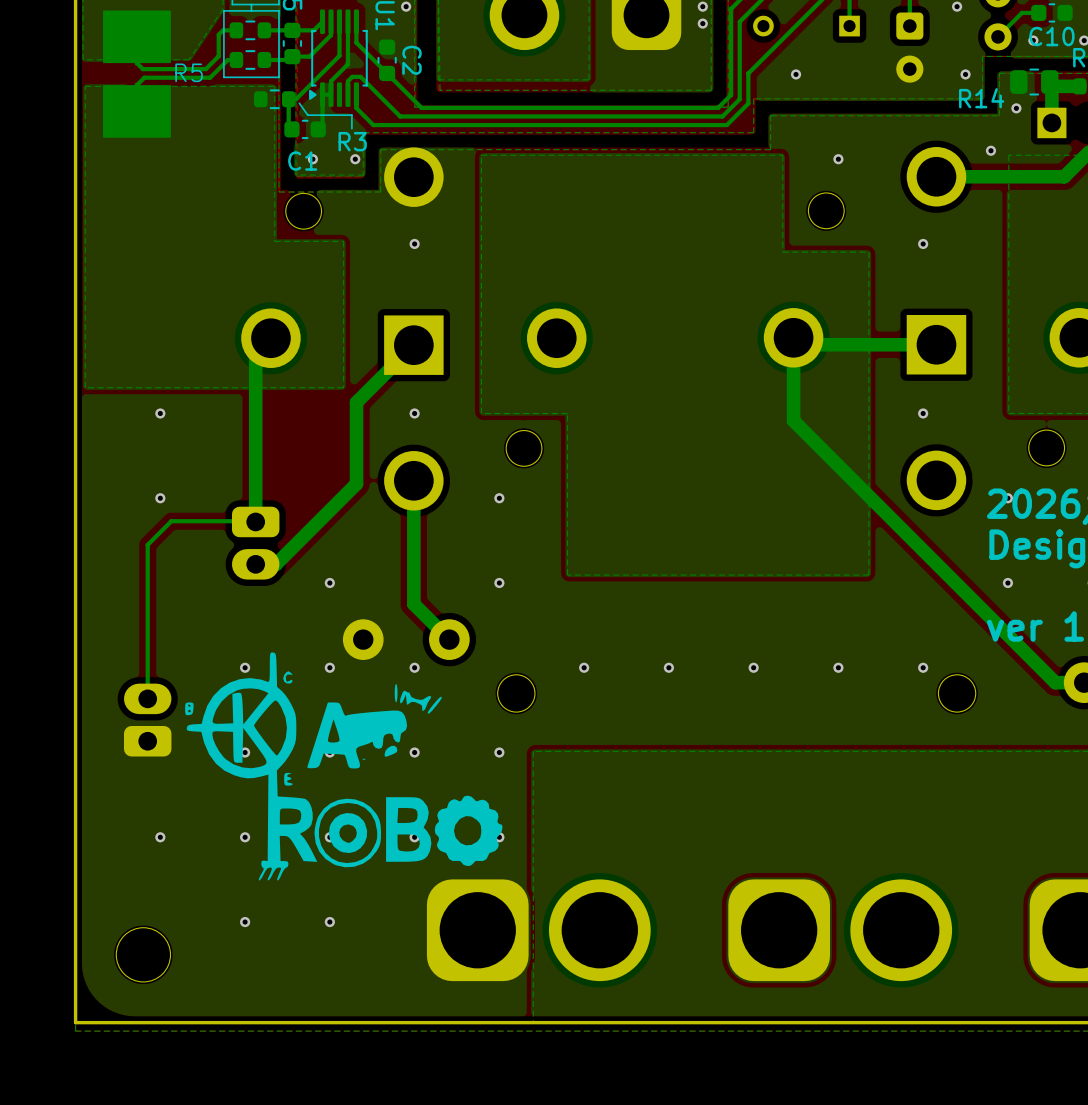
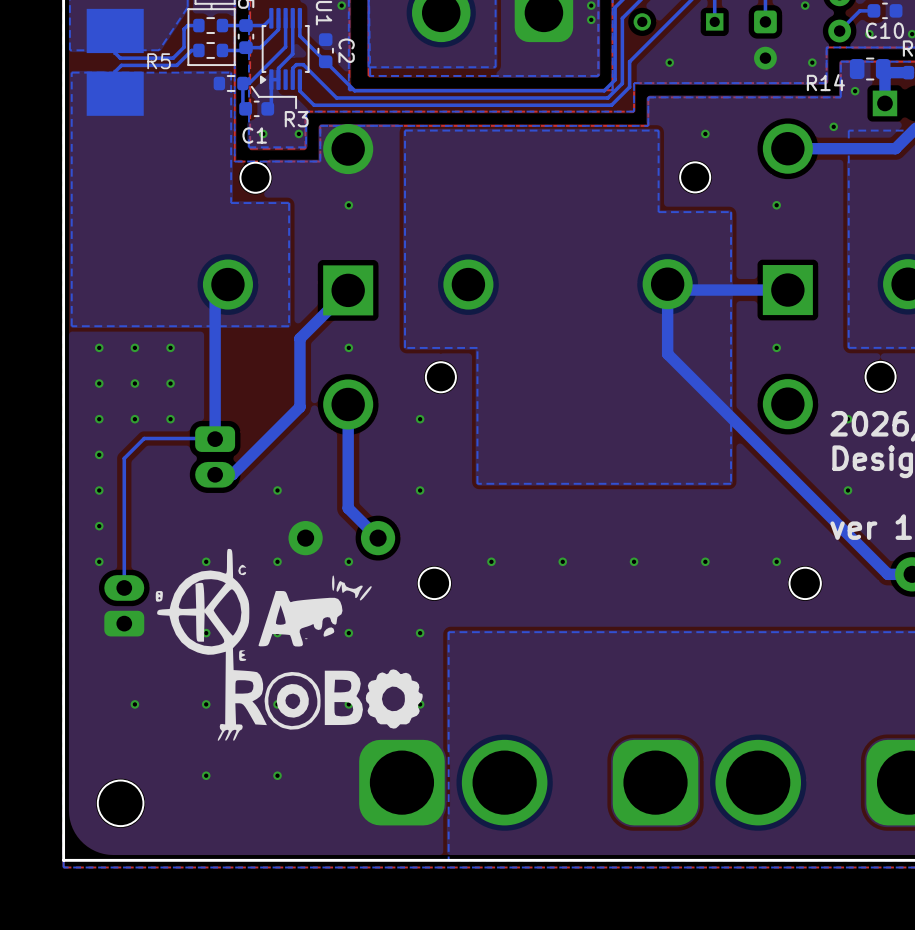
via: none -> (99, 347)
via: none -> (170, 347)
via: none -> (99, 383)
via: none -> (134, 383)
via: none -> (170, 383)
via: none -> (99, 419)
via: none -> (170, 419)
via: none -> (99, 454)
via: none -> (99, 490)
via: none -> (99, 526)
via: none -> (99, 561)

